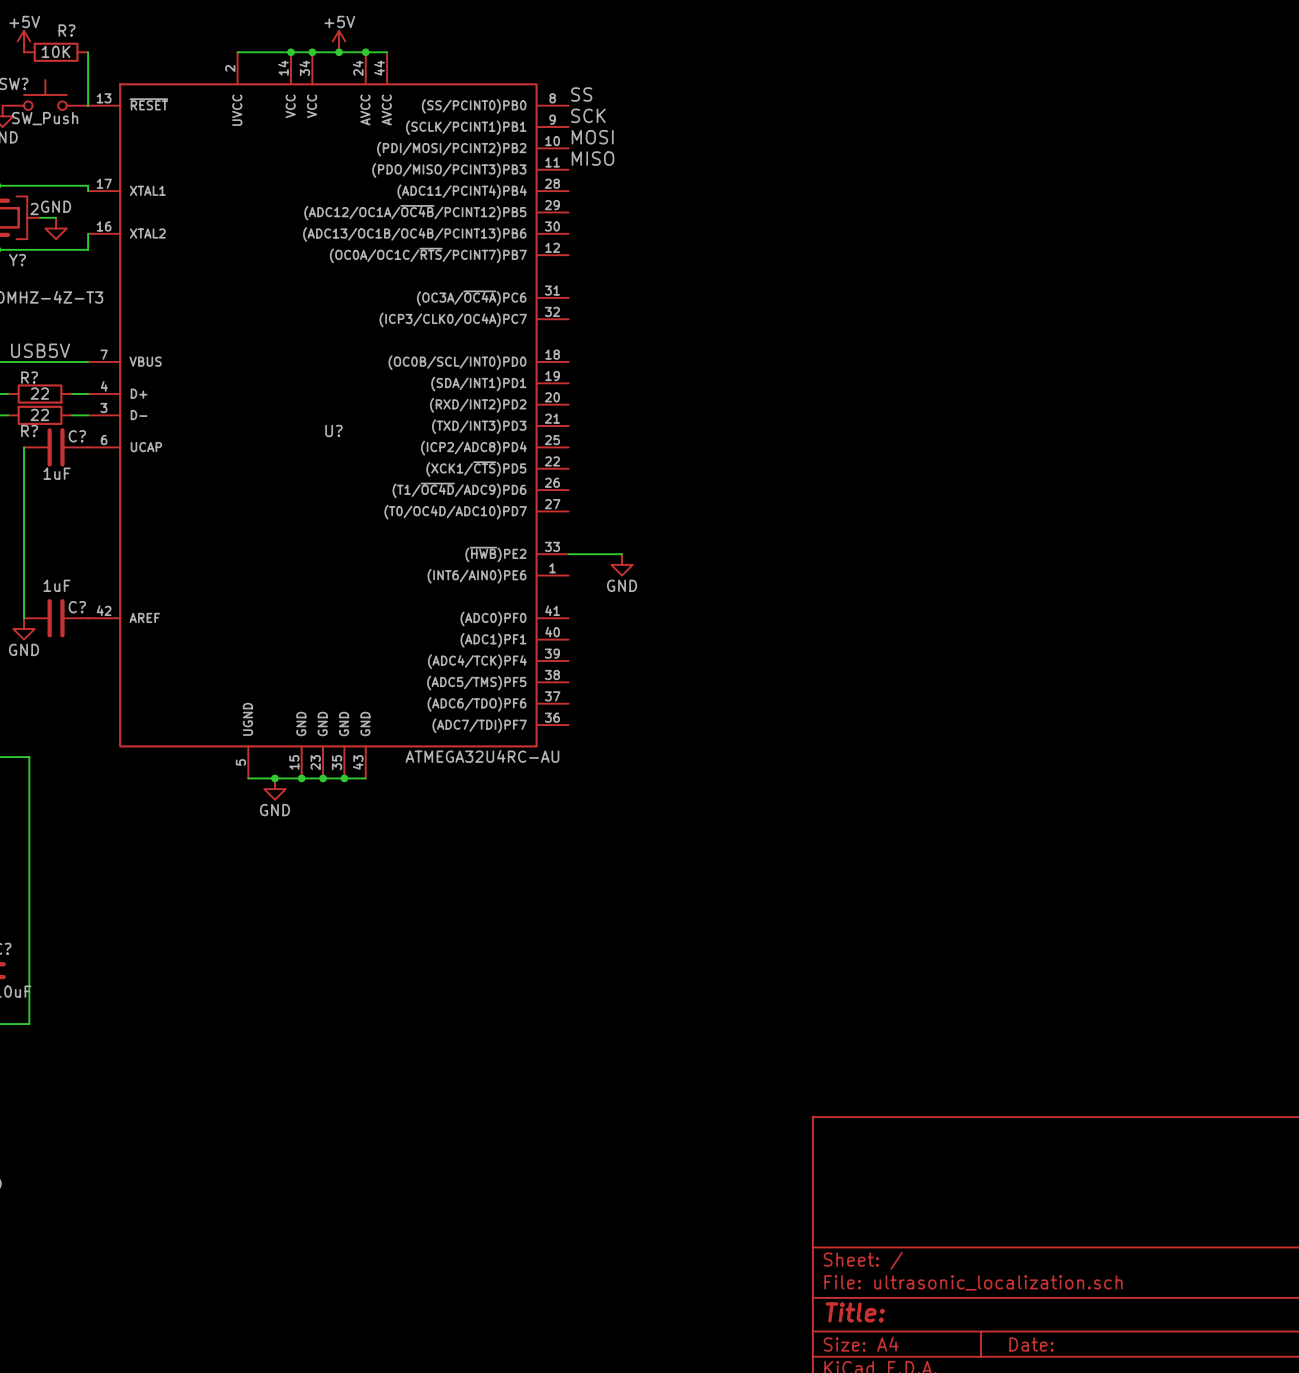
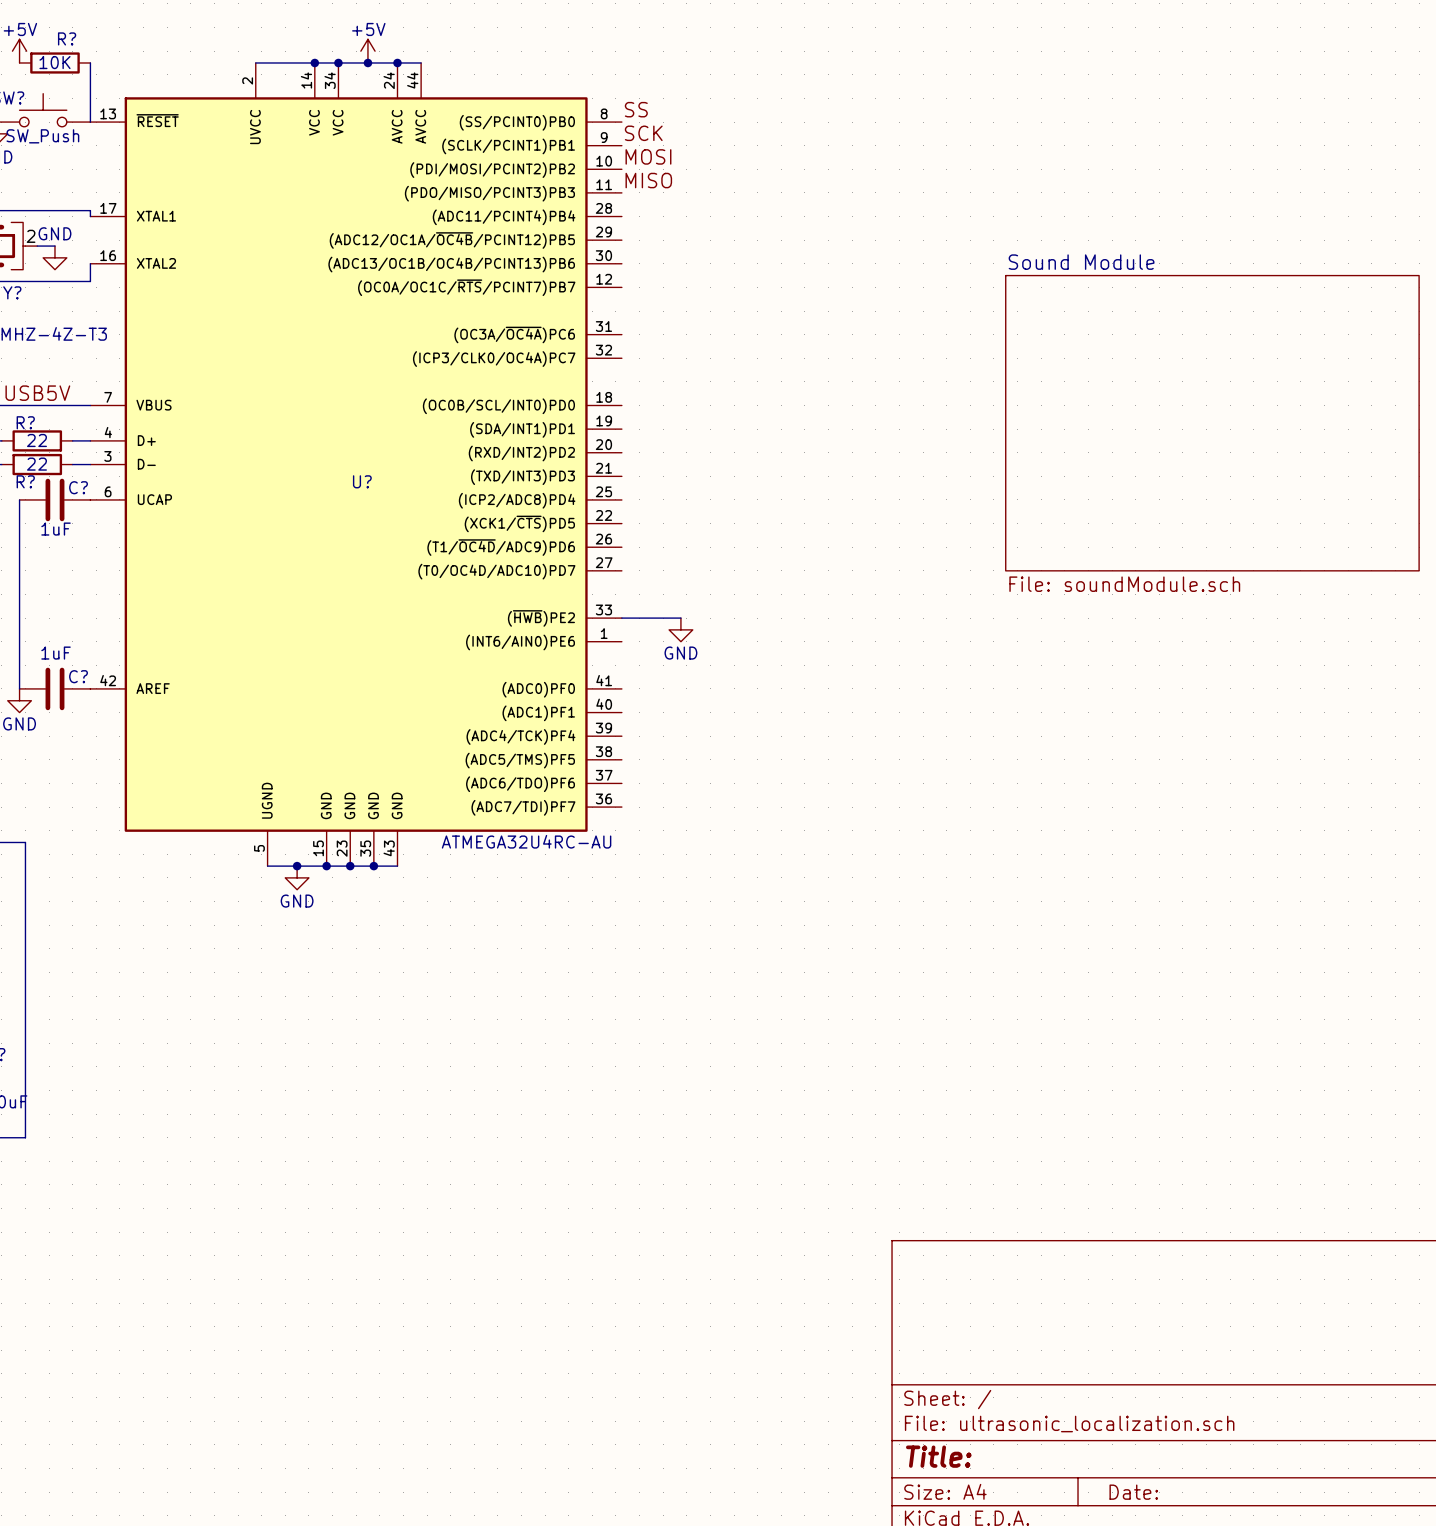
sheet Sound Module: none -> File: soundModule.sch (1212, 423)

